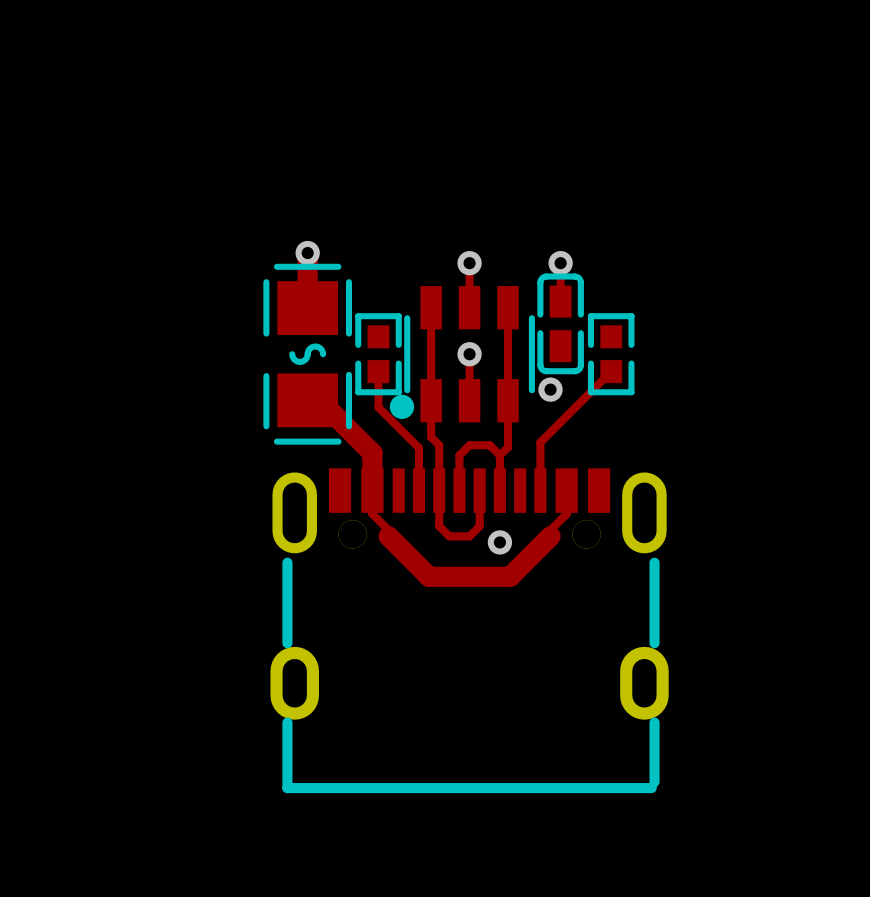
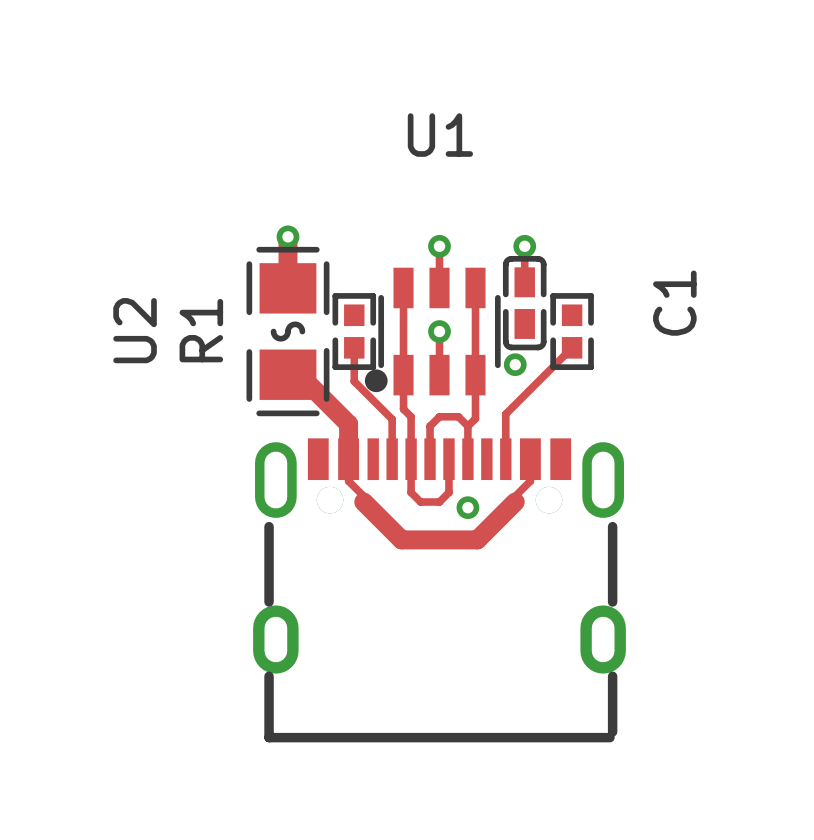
U1 name: none -> U1 (440, 135)
C1 name: none -> C1 (674, 303)
U2 name: none -> U2 (135, 330)
R1 name: none -> R1 (201, 330)

